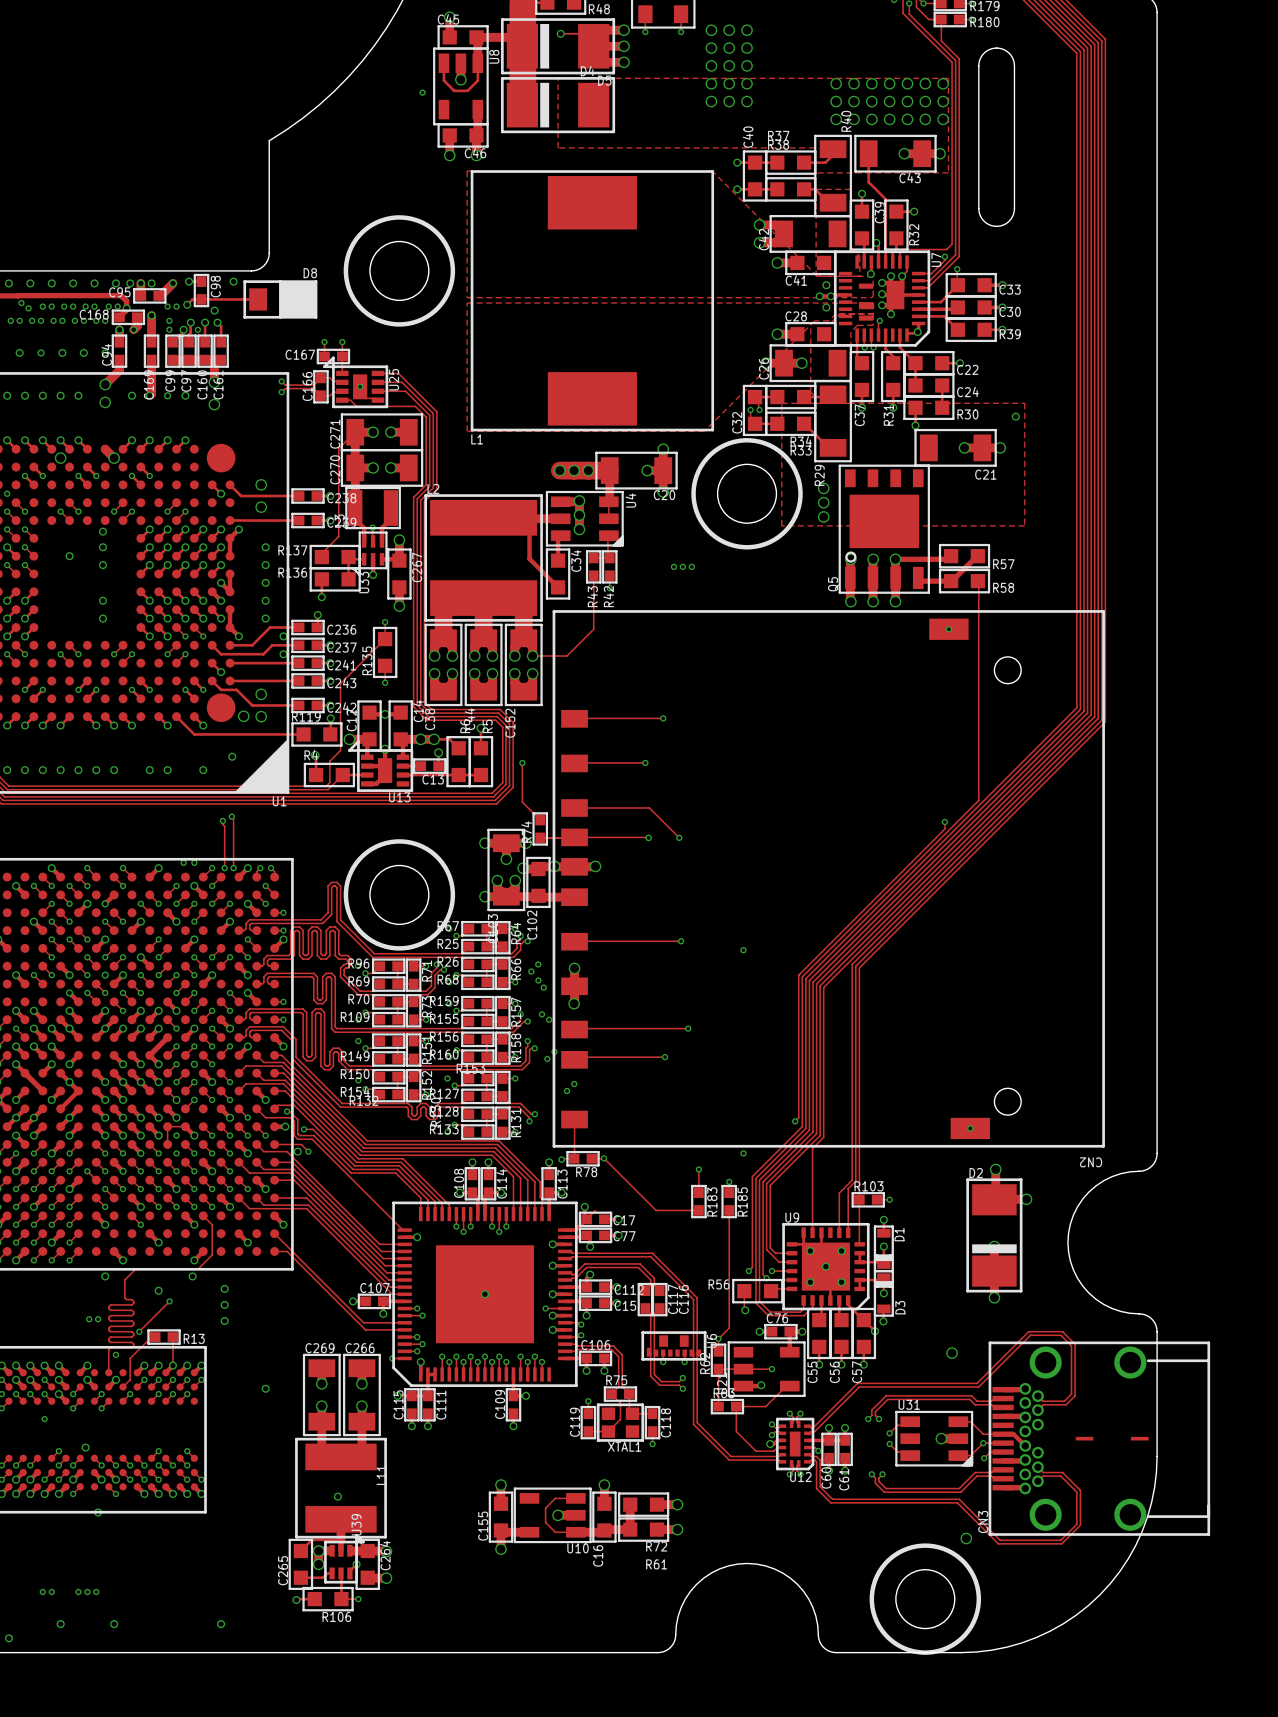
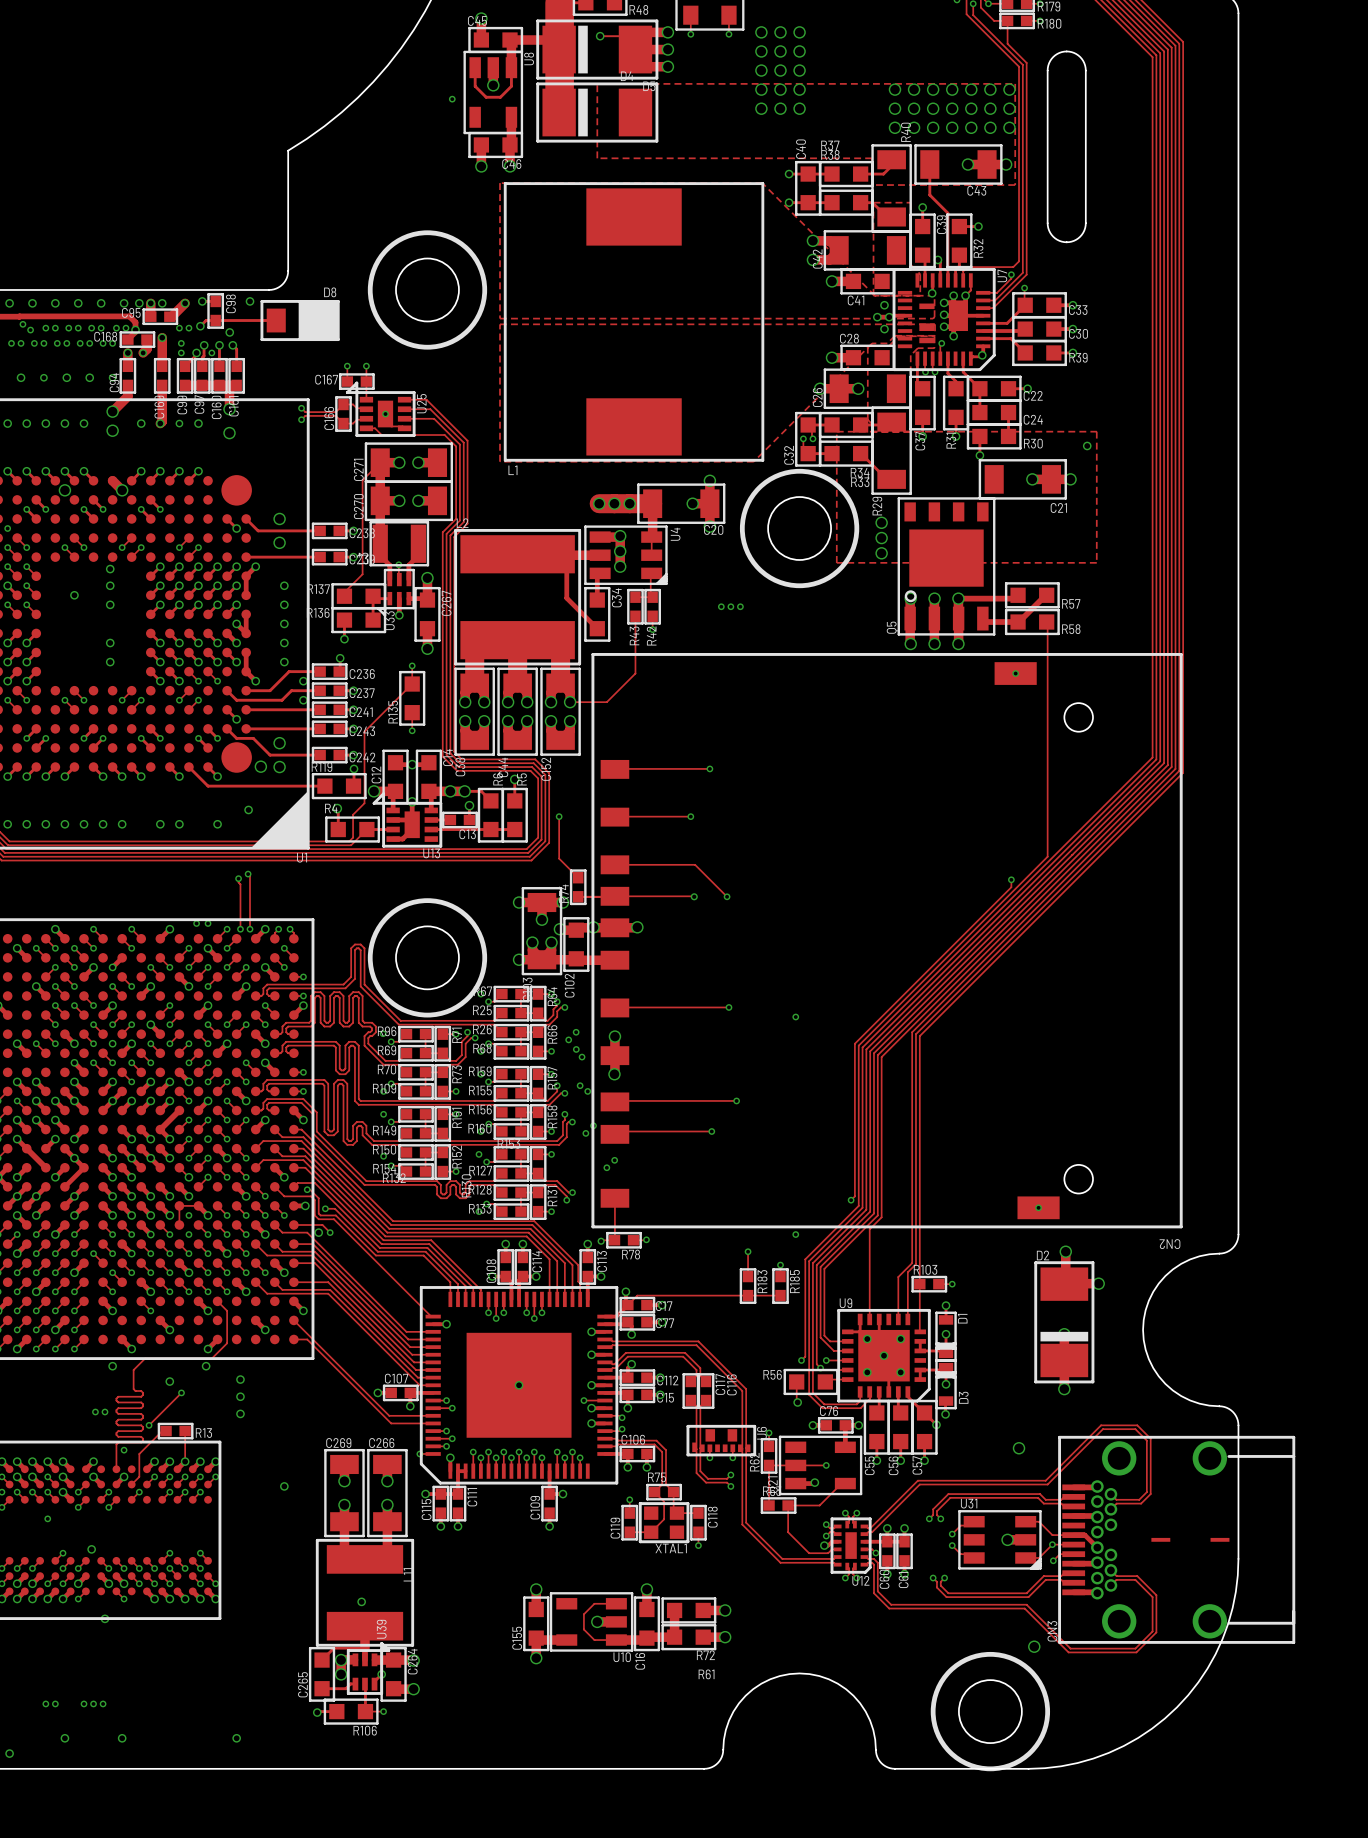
track: (603, 1158) (656, 1210) -> (637, 1295) (702, 1295)
track: (729, 1210) (729, 1328) (718, 1338) -> (780, 1295) (748, 1295)

